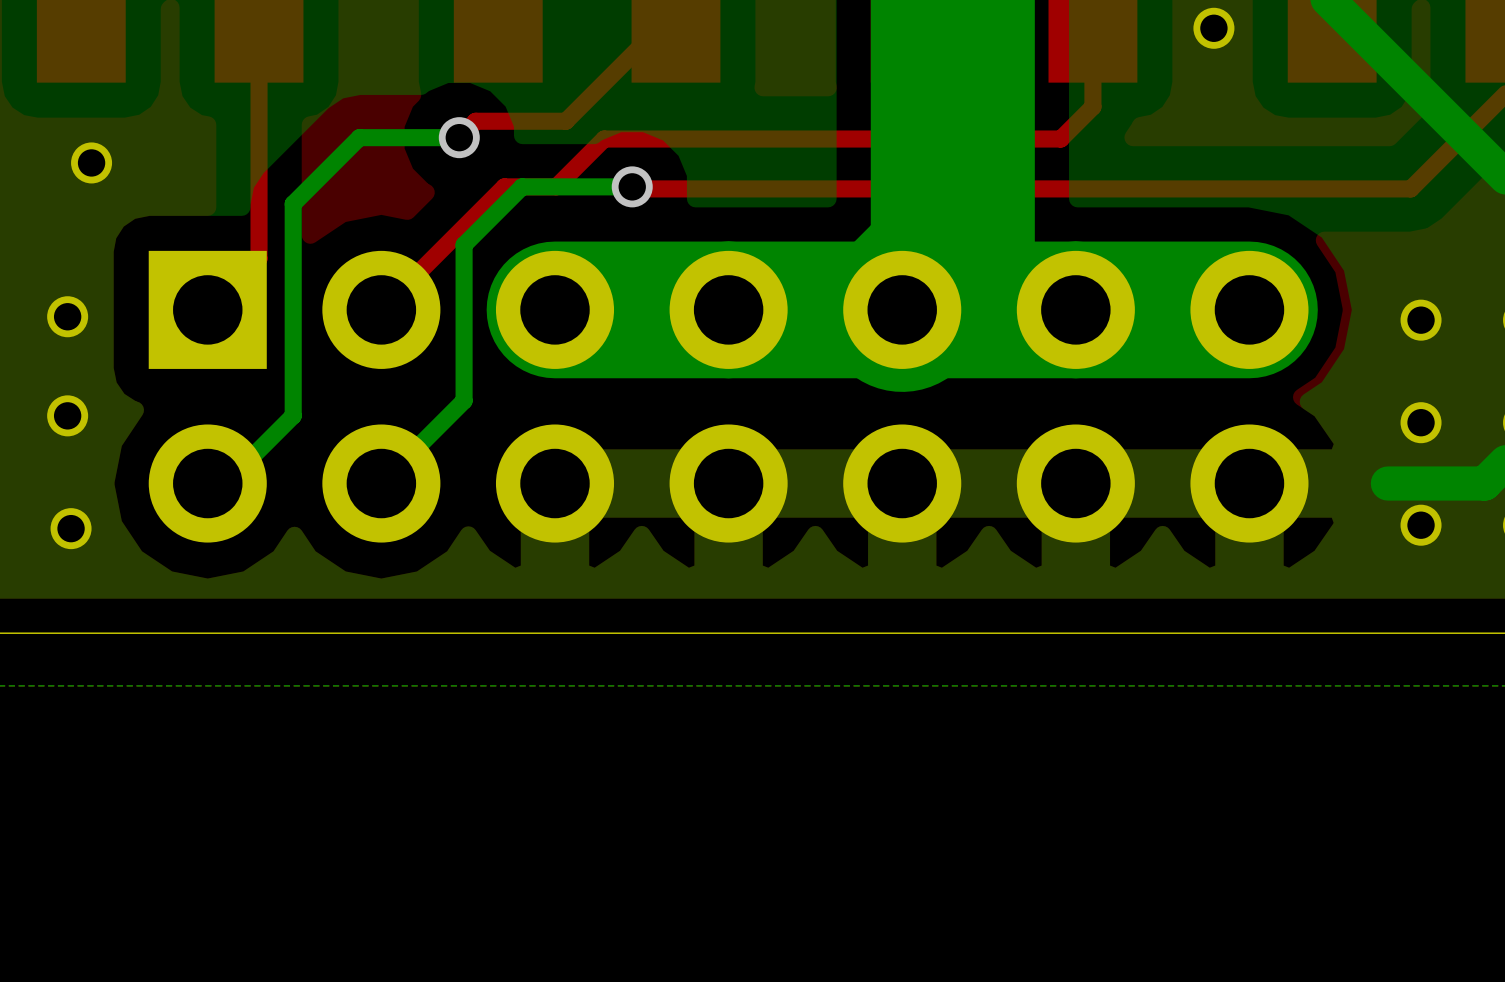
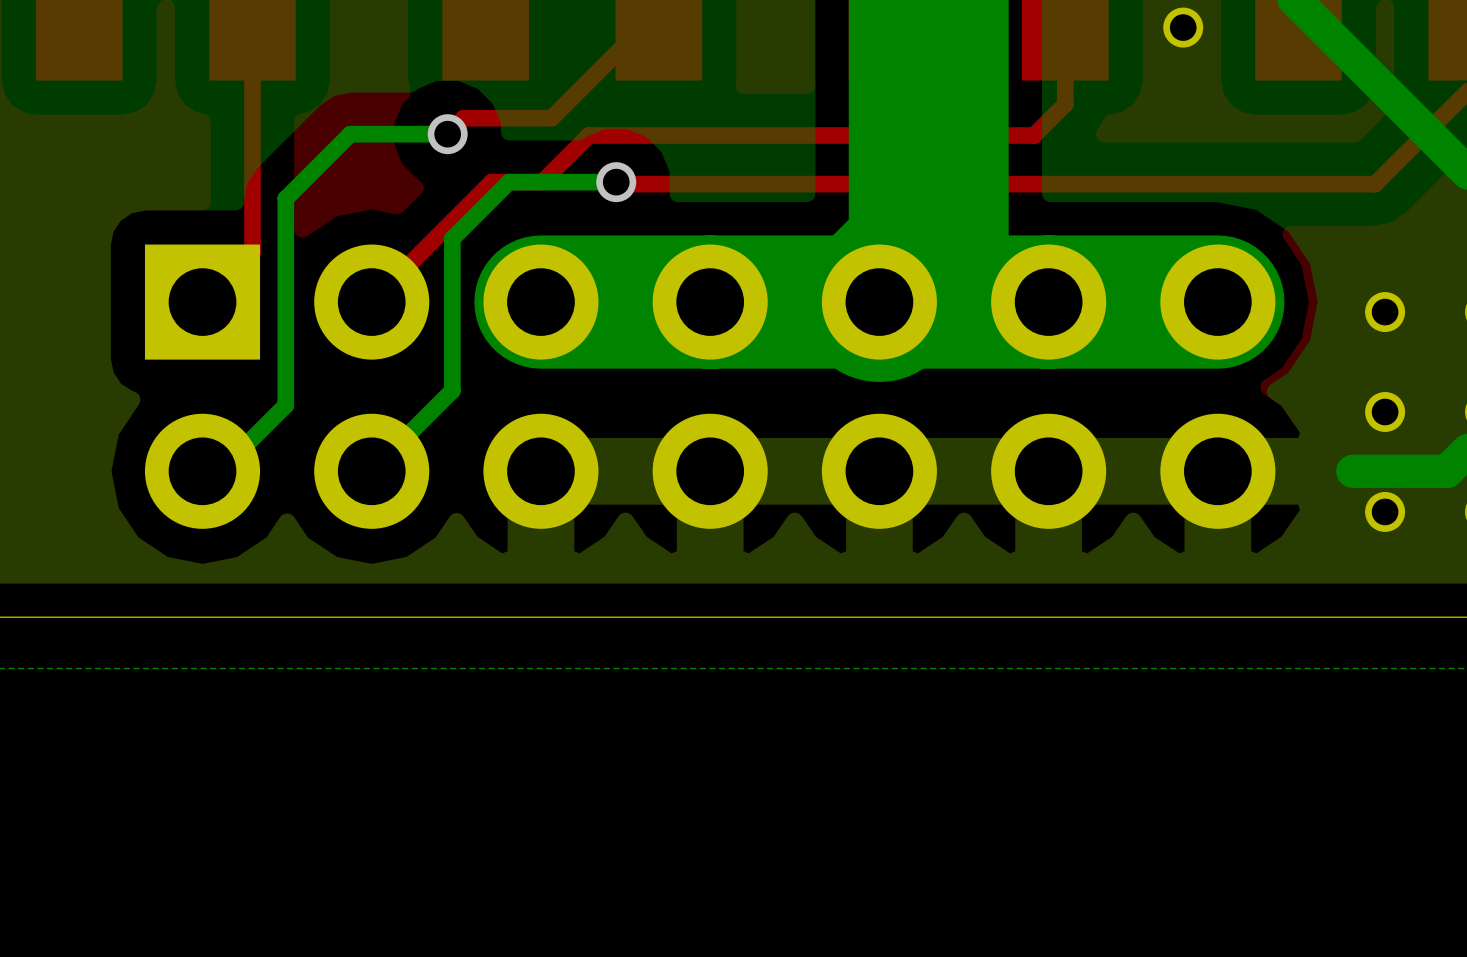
part: (91, 162) -> none
part: (67, 316) -> none
part: (67, 415) -> none
part: (71, 528) -> none

